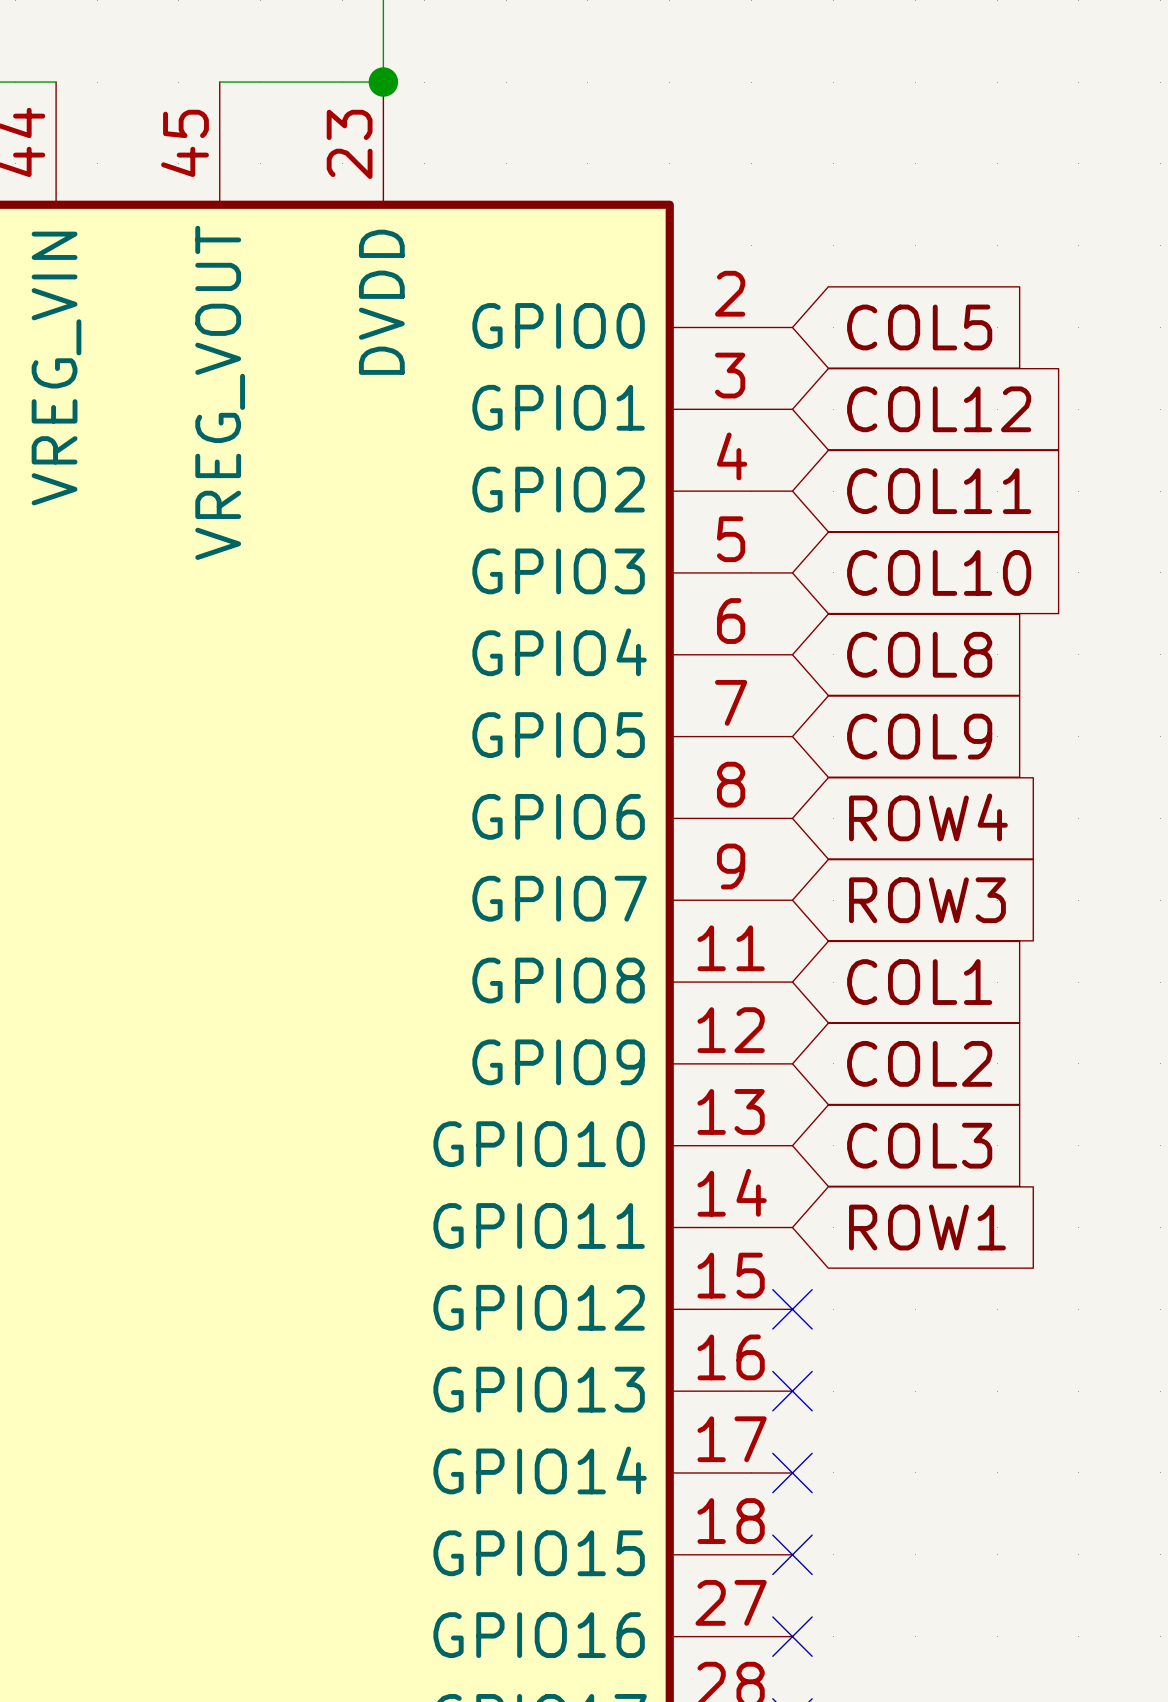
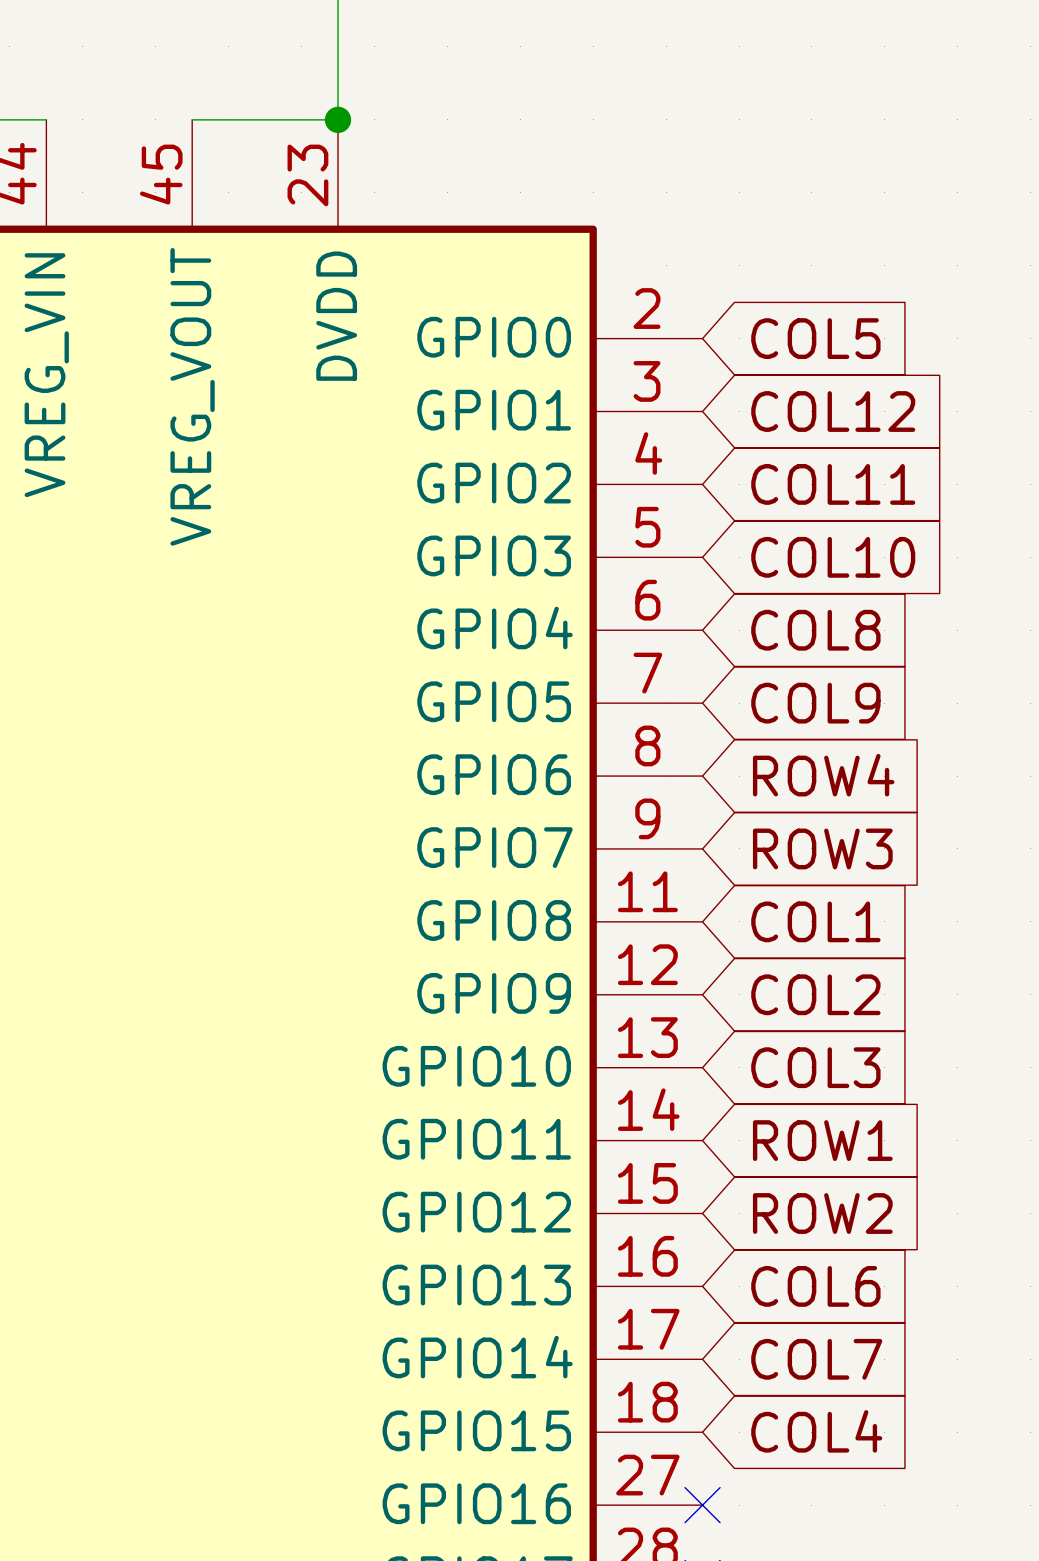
no-connect mark: (792, 1309) -> none
global label: none -> ROW2 (822, 1213)
no-connect mark: (792, 1391) -> none
global label: none -> COL6 (815, 1286)
no-connect mark: (792, 1472) -> none
global label: none -> COL7 (816, 1359)
global label: none -> COL4 (816, 1431)
no-connect mark: (792, 1554) -> none

